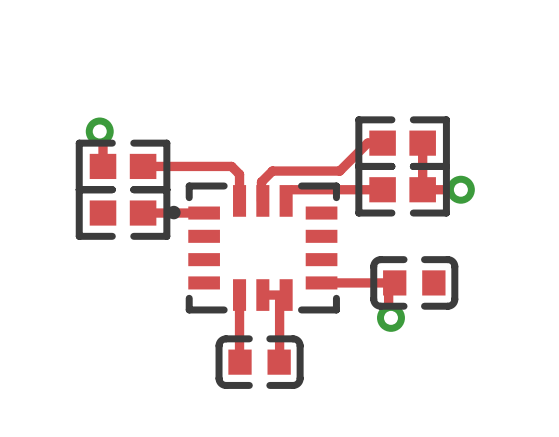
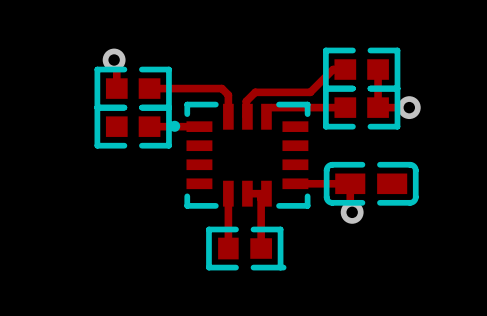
part footprint: [370, 256, 459, 310] -> [323, 161, 419, 206]
part footprint: [215, 335, 304, 389] -> [206, 226, 287, 271]

